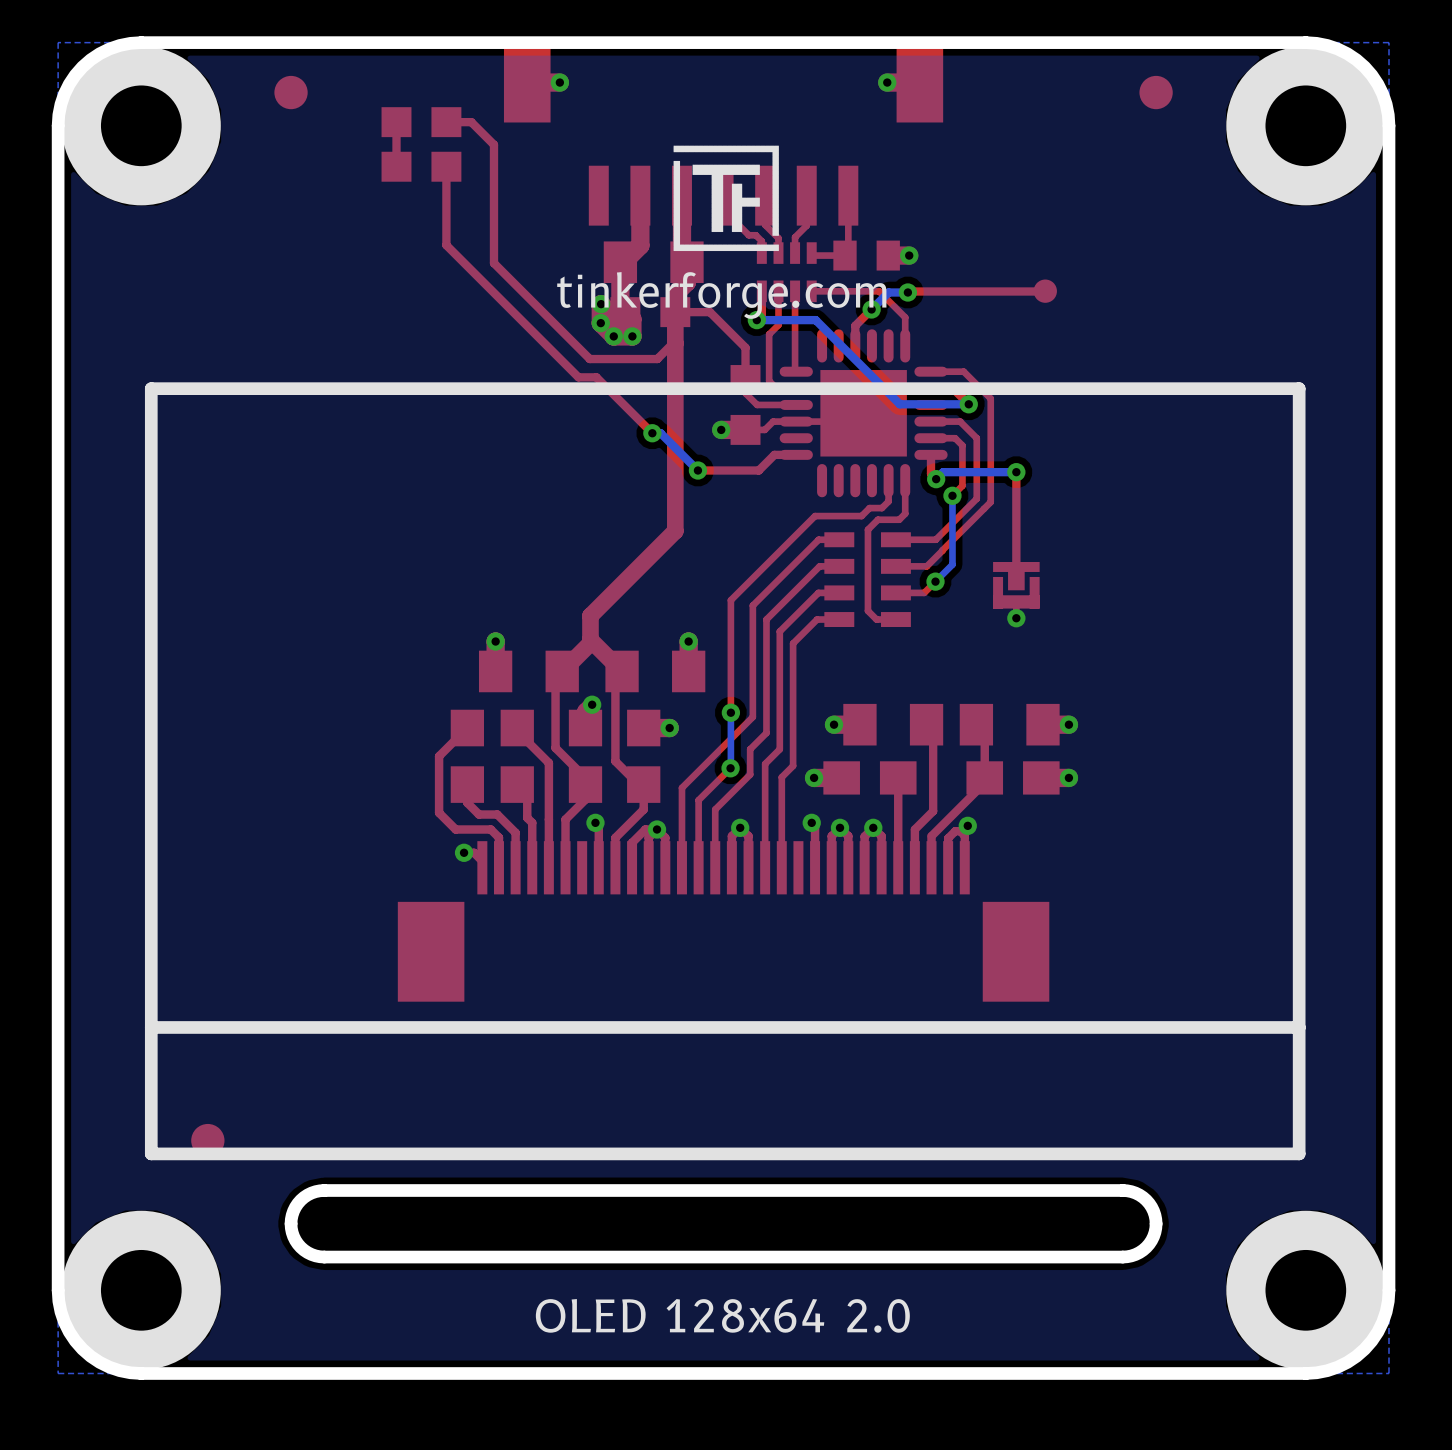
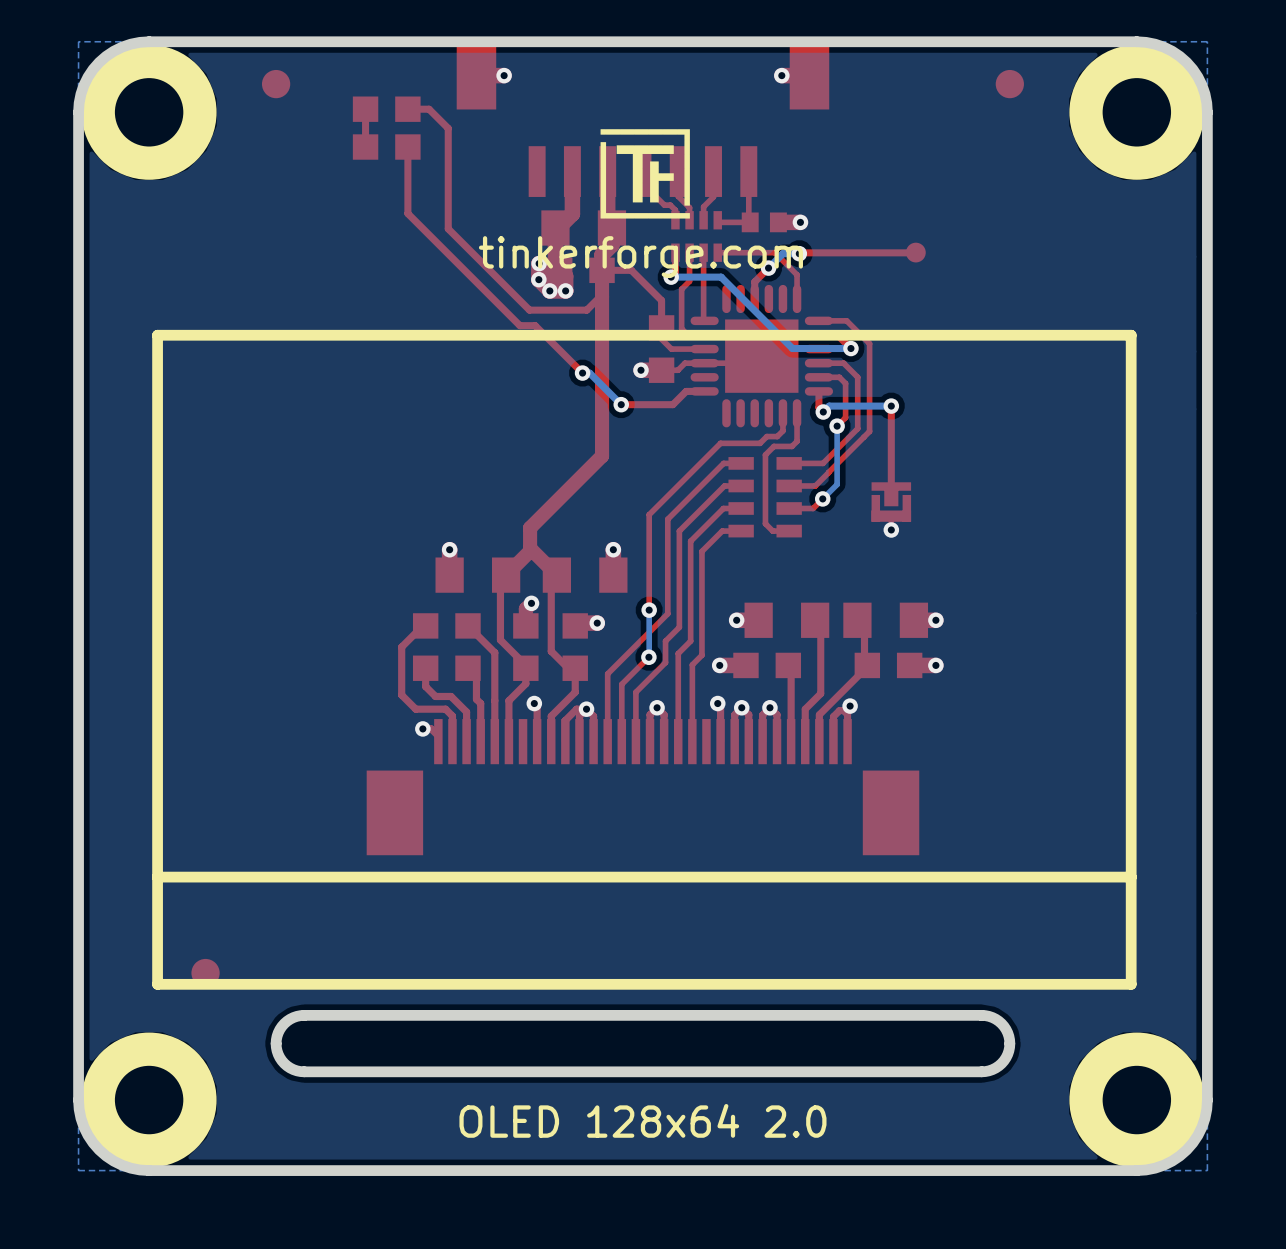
part footprint: [833, 240, 900, 271] -> [741, 212, 787, 233]
part footprint: [450, 709, 485, 803] -> [412, 613, 439, 681]
part footprint: [500, 709, 534, 803] -> [455, 613, 481, 681]
part footprint: [568, 709, 603, 803] -> [513, 613, 539, 681]
part footprint: [627, 709, 661, 803] -> [562, 613, 588, 681]
part footprint: [823, 761, 917, 795] -> [733, 652, 802, 679]
part footprint: [966, 761, 1060, 795] -> [854, 652, 923, 679]

